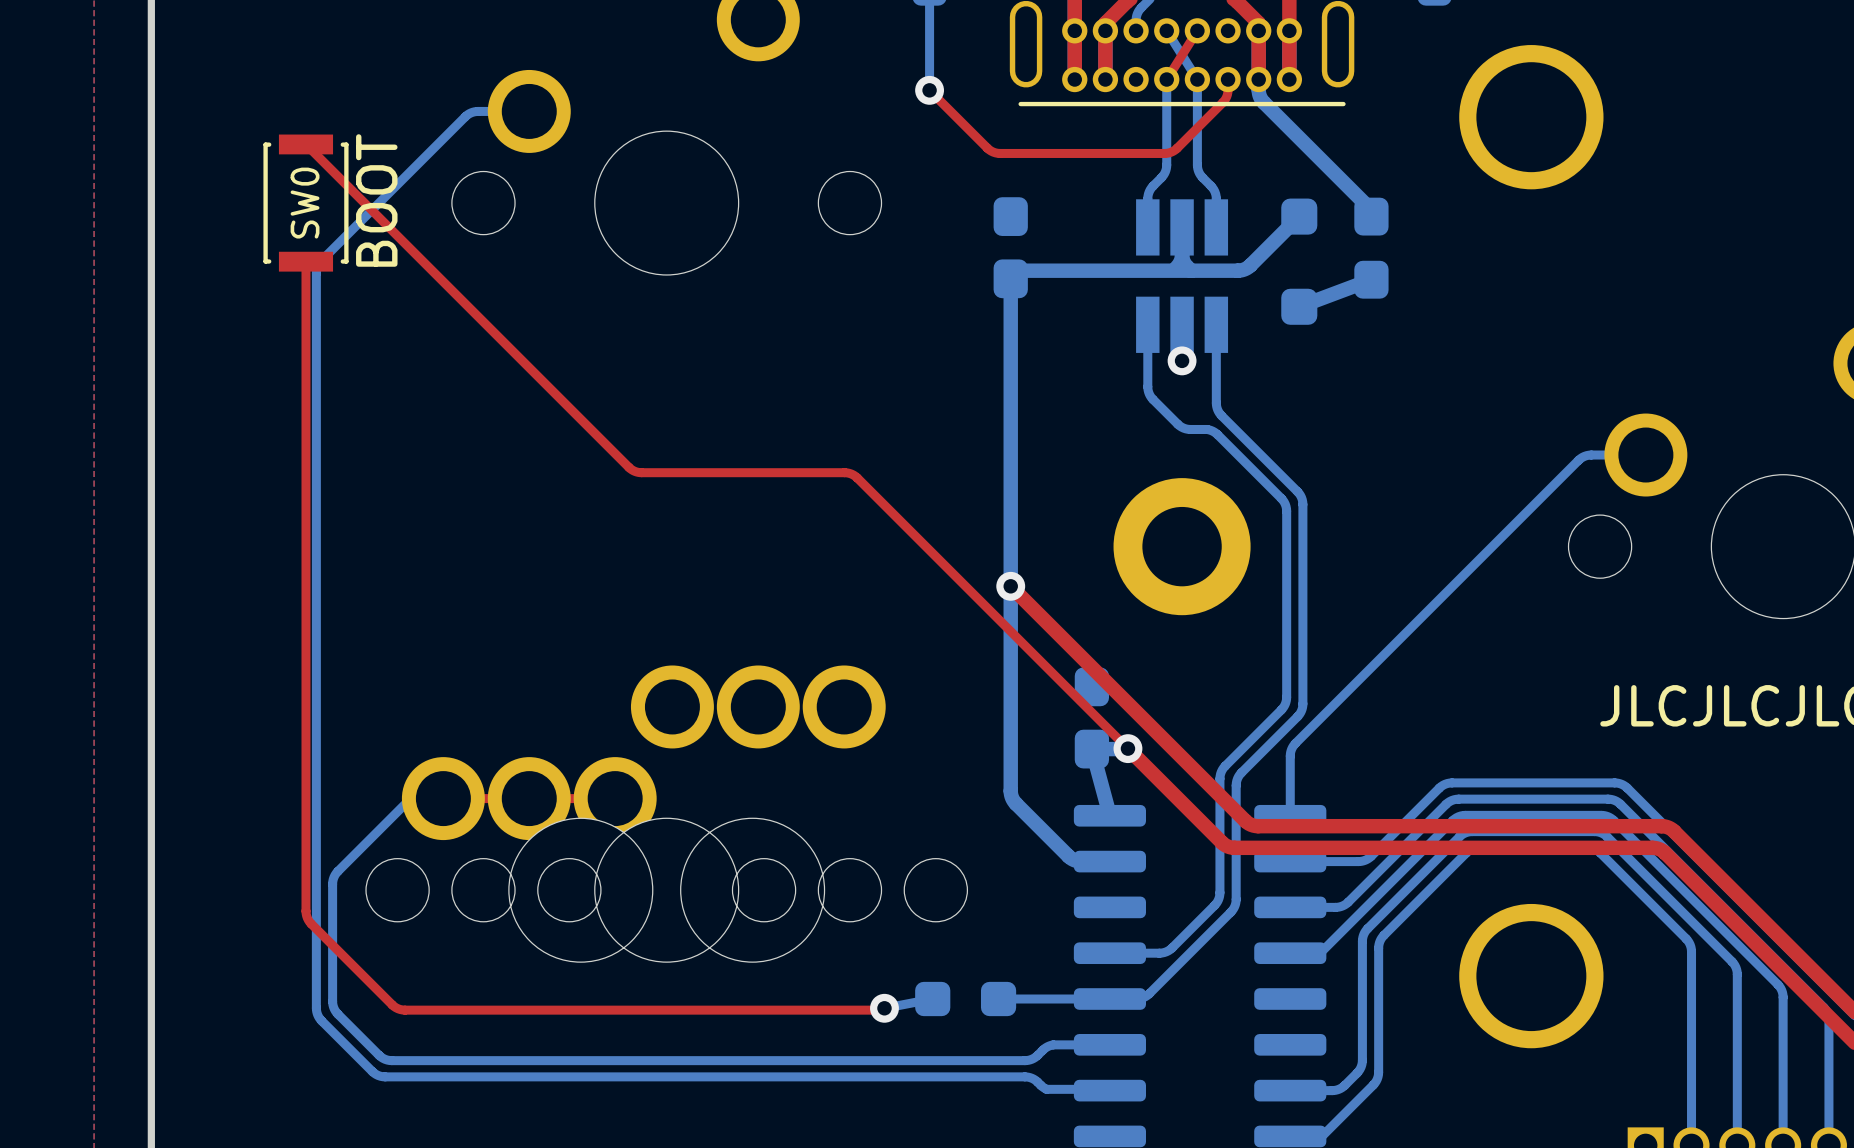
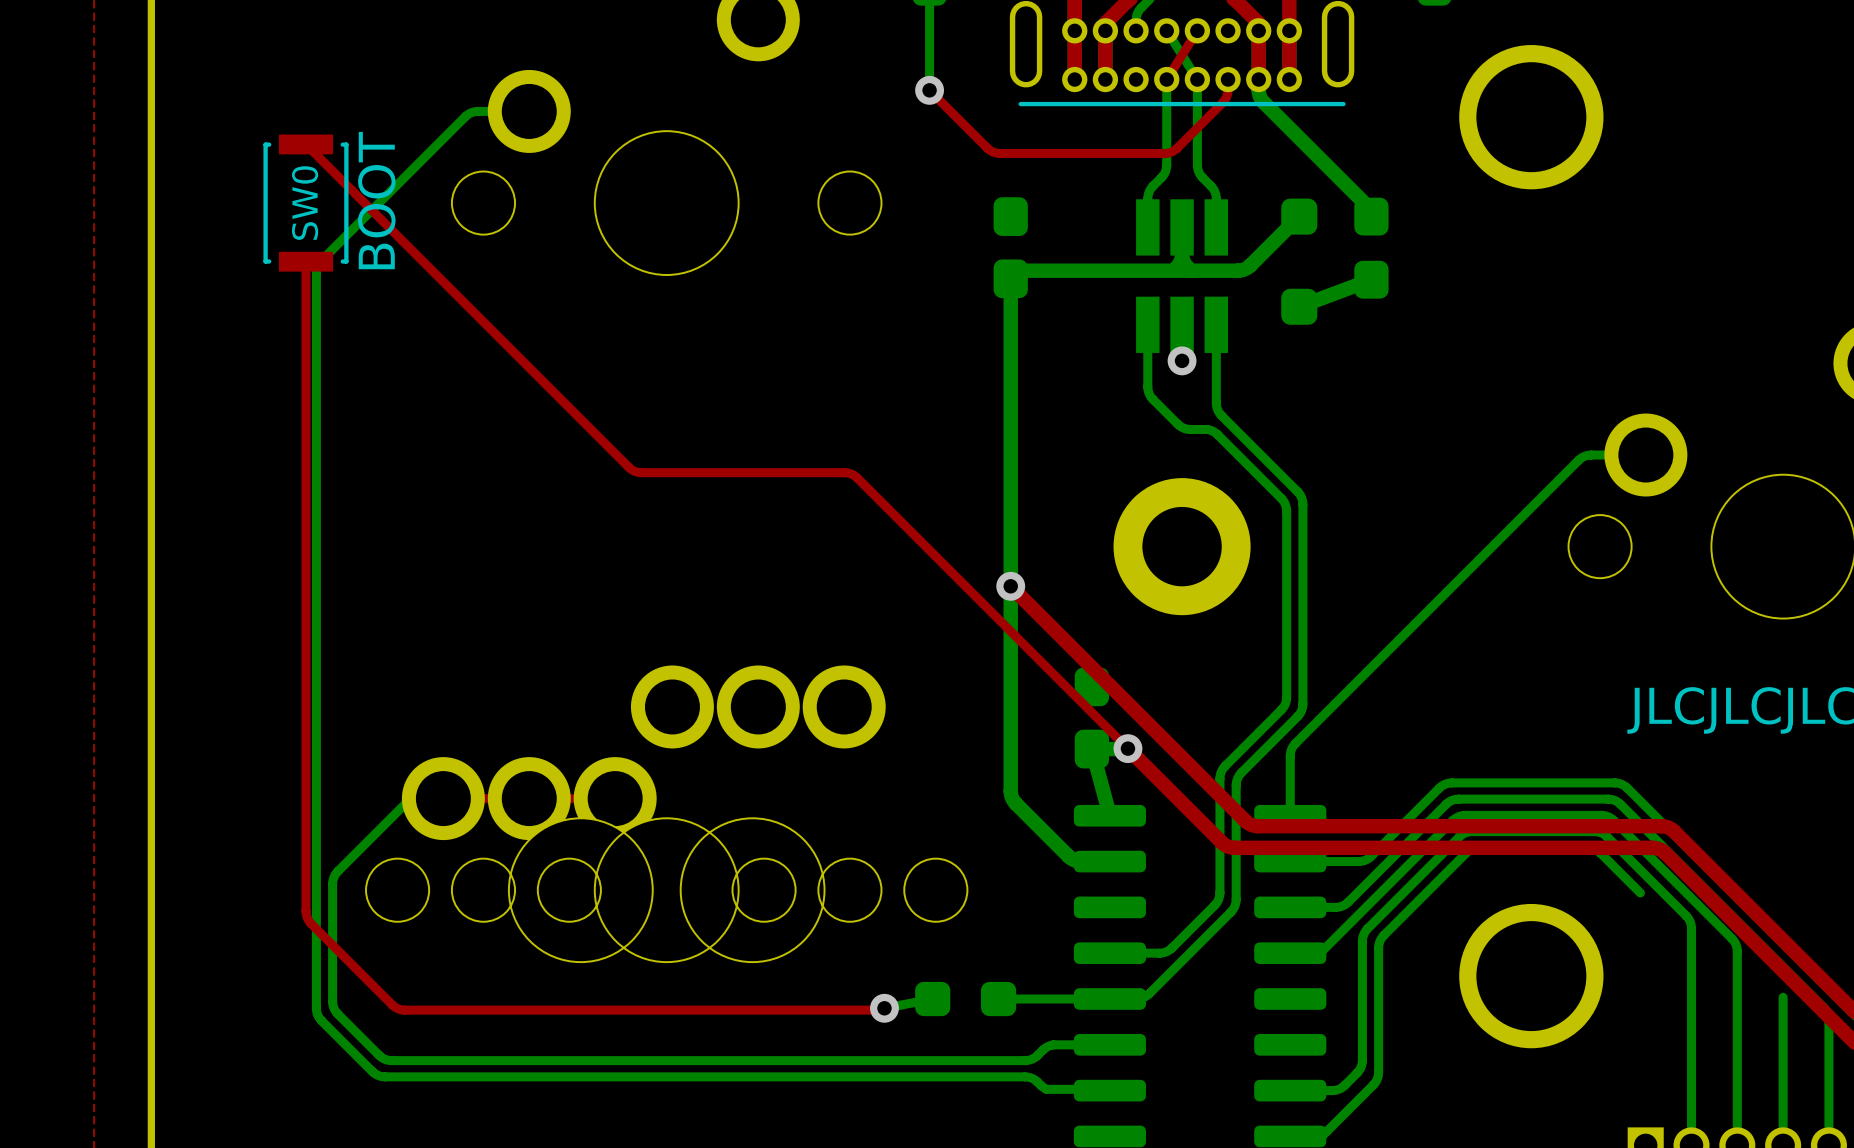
bottom track: (1640, 893) (1687, 940) (1691, 951) -> (1686, 915) (1691, 926) (1691, 951)
bottom track: (1686, 915) (1733, 963) (1737, 974) -> none
bottom track: (1732, 938) (1779, 986) (1783, 997) -> (1732, 938) (1737, 949) (1737, 974)

